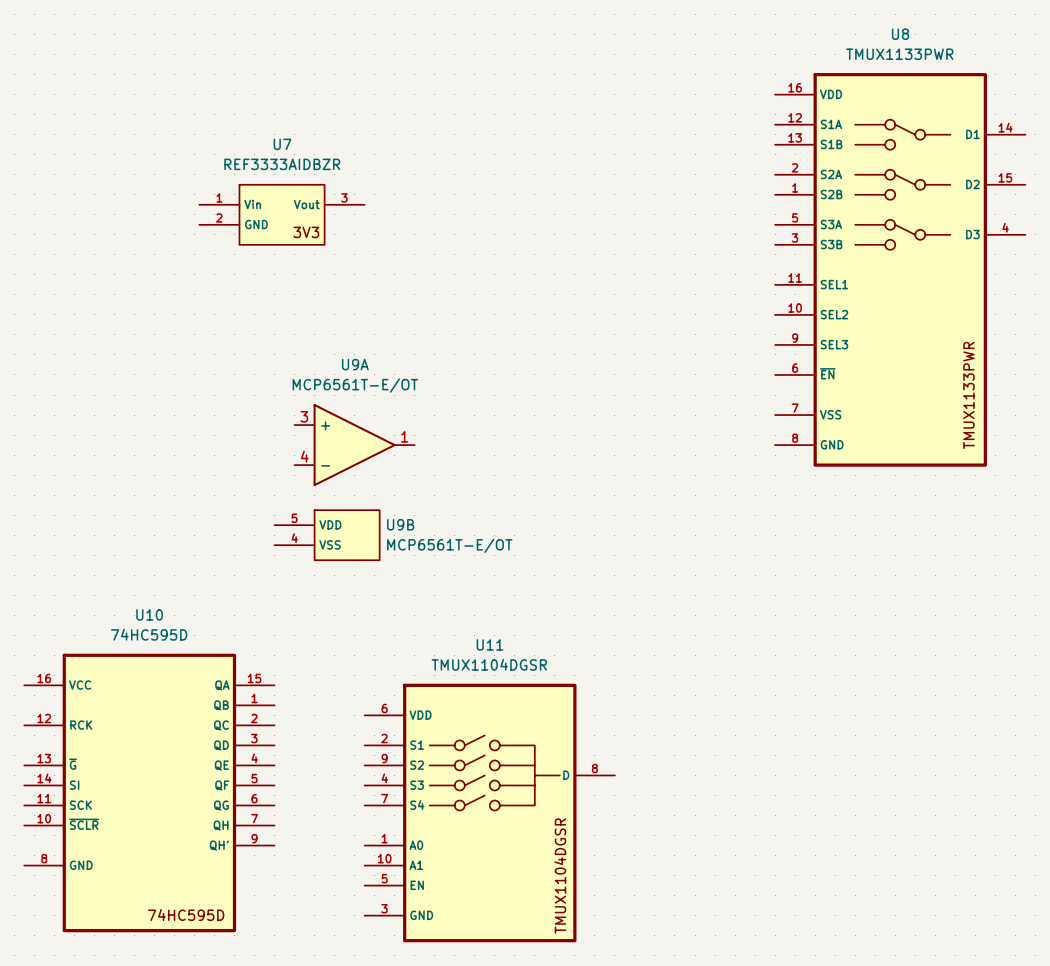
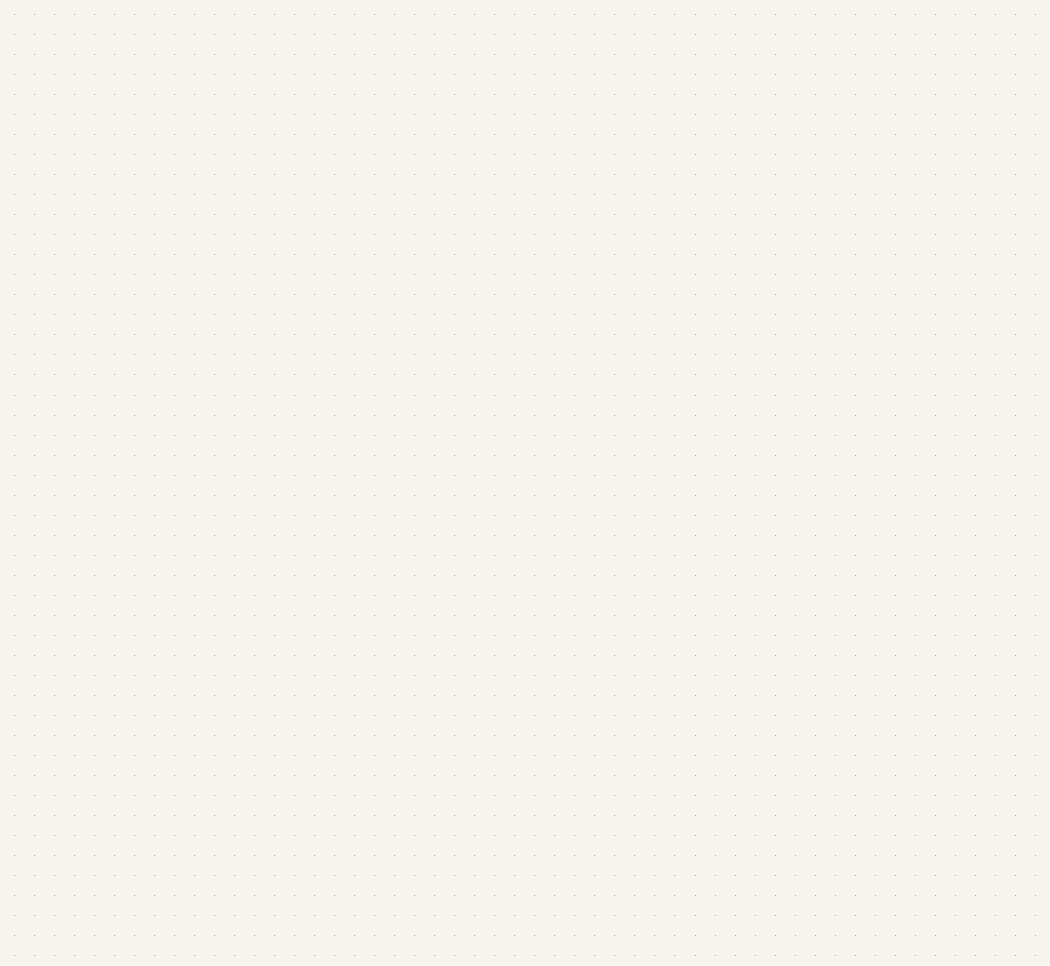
U7: REF3333AIDBZR (282, 214) -> none
U8: TMUX1133PWR (900, 269) -> none
U9A: MCP6561T-E/OT (354, 445) -> none
U9B: MCP6561T-E/OT (327, 535) -> none
U10: 74HC595D (149, 792) -> none
U11: TMUX1104DGSR (489, 813) -> none

